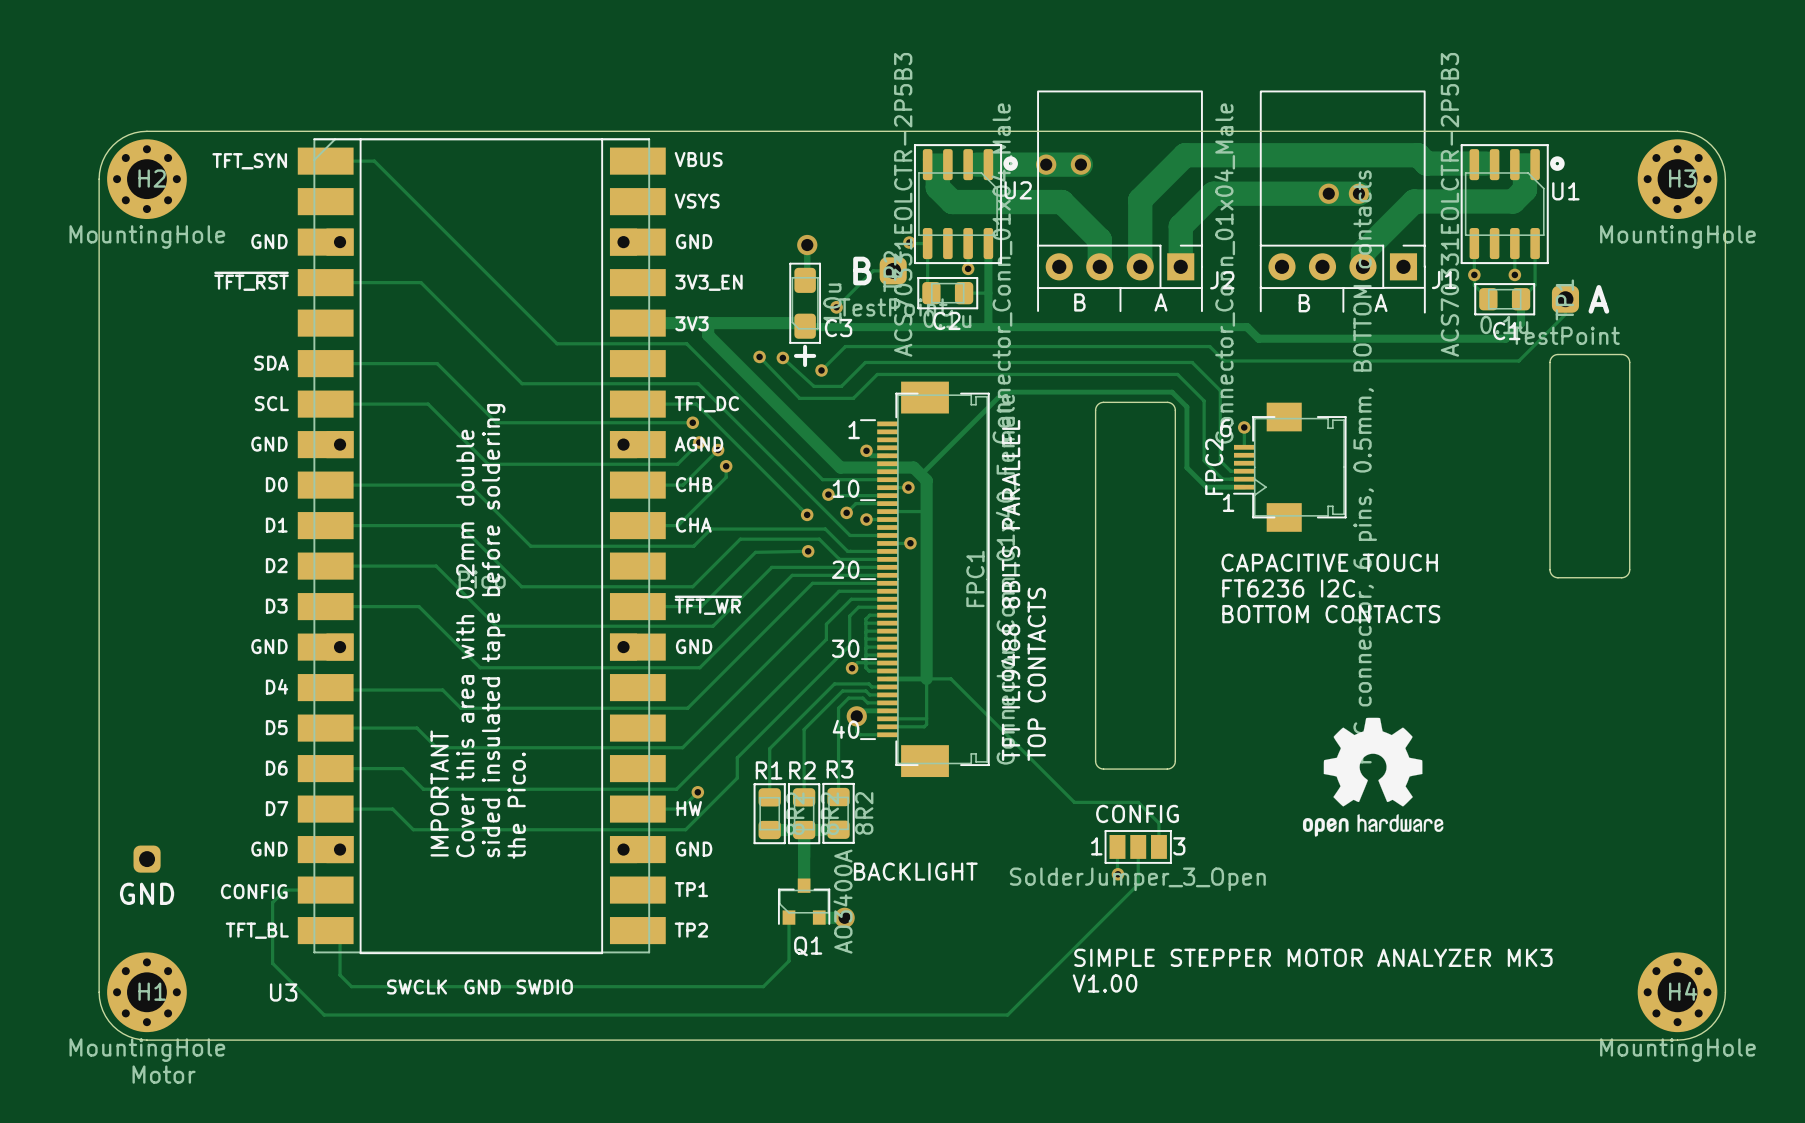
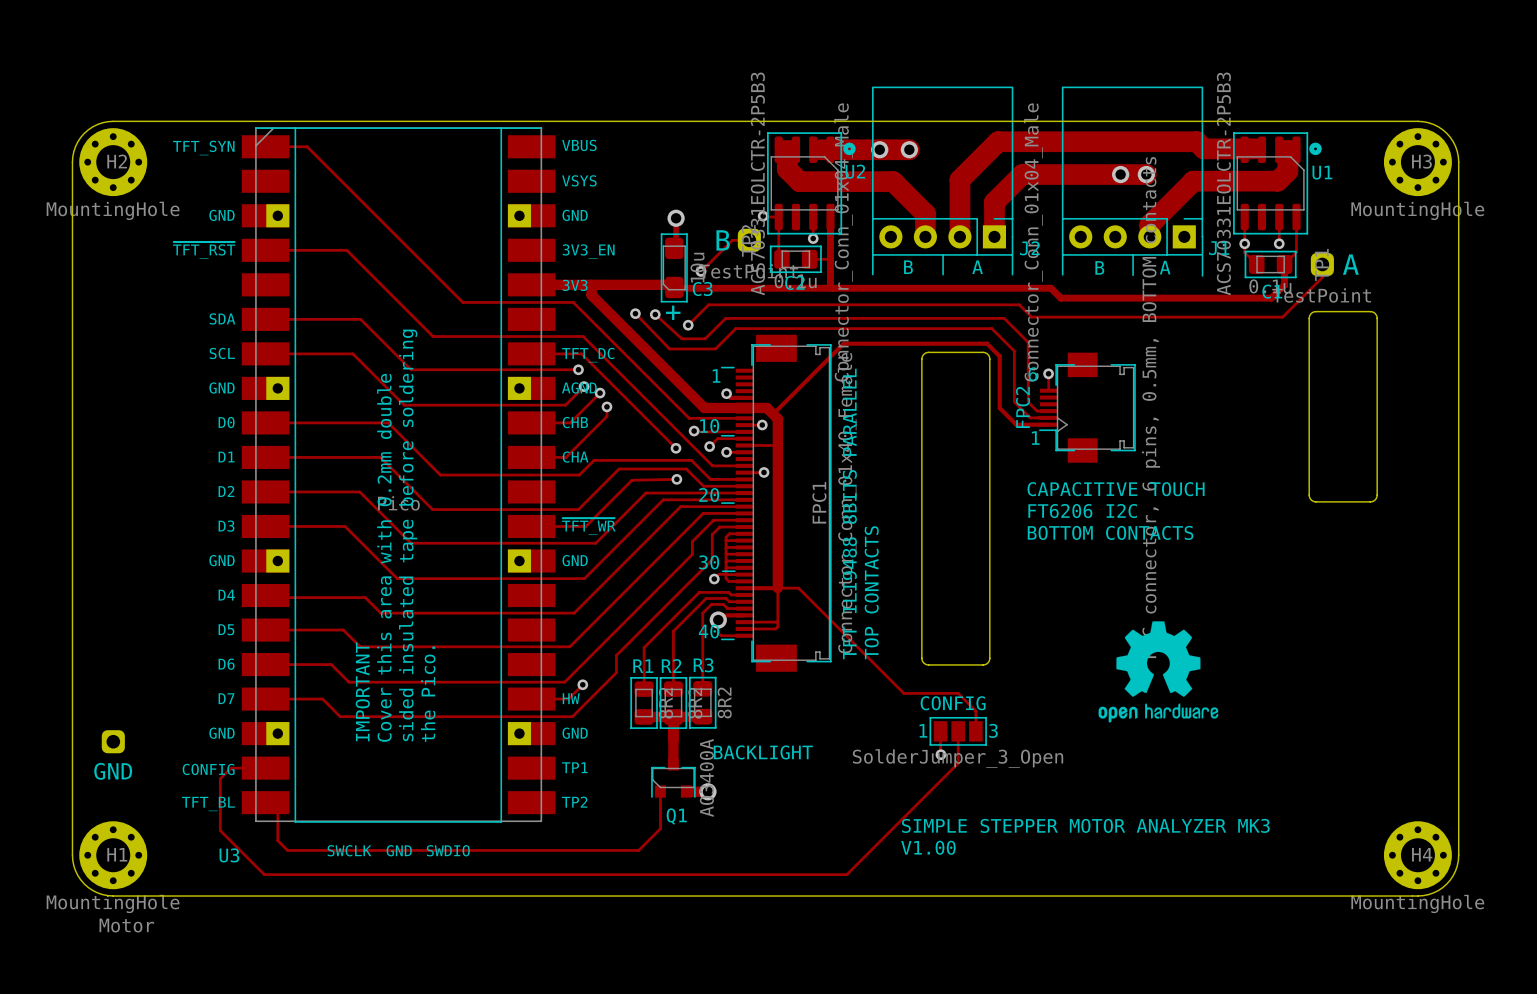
text: FT6236 I2C (1288, 588) -> FT6206 I2C (1082, 511)

